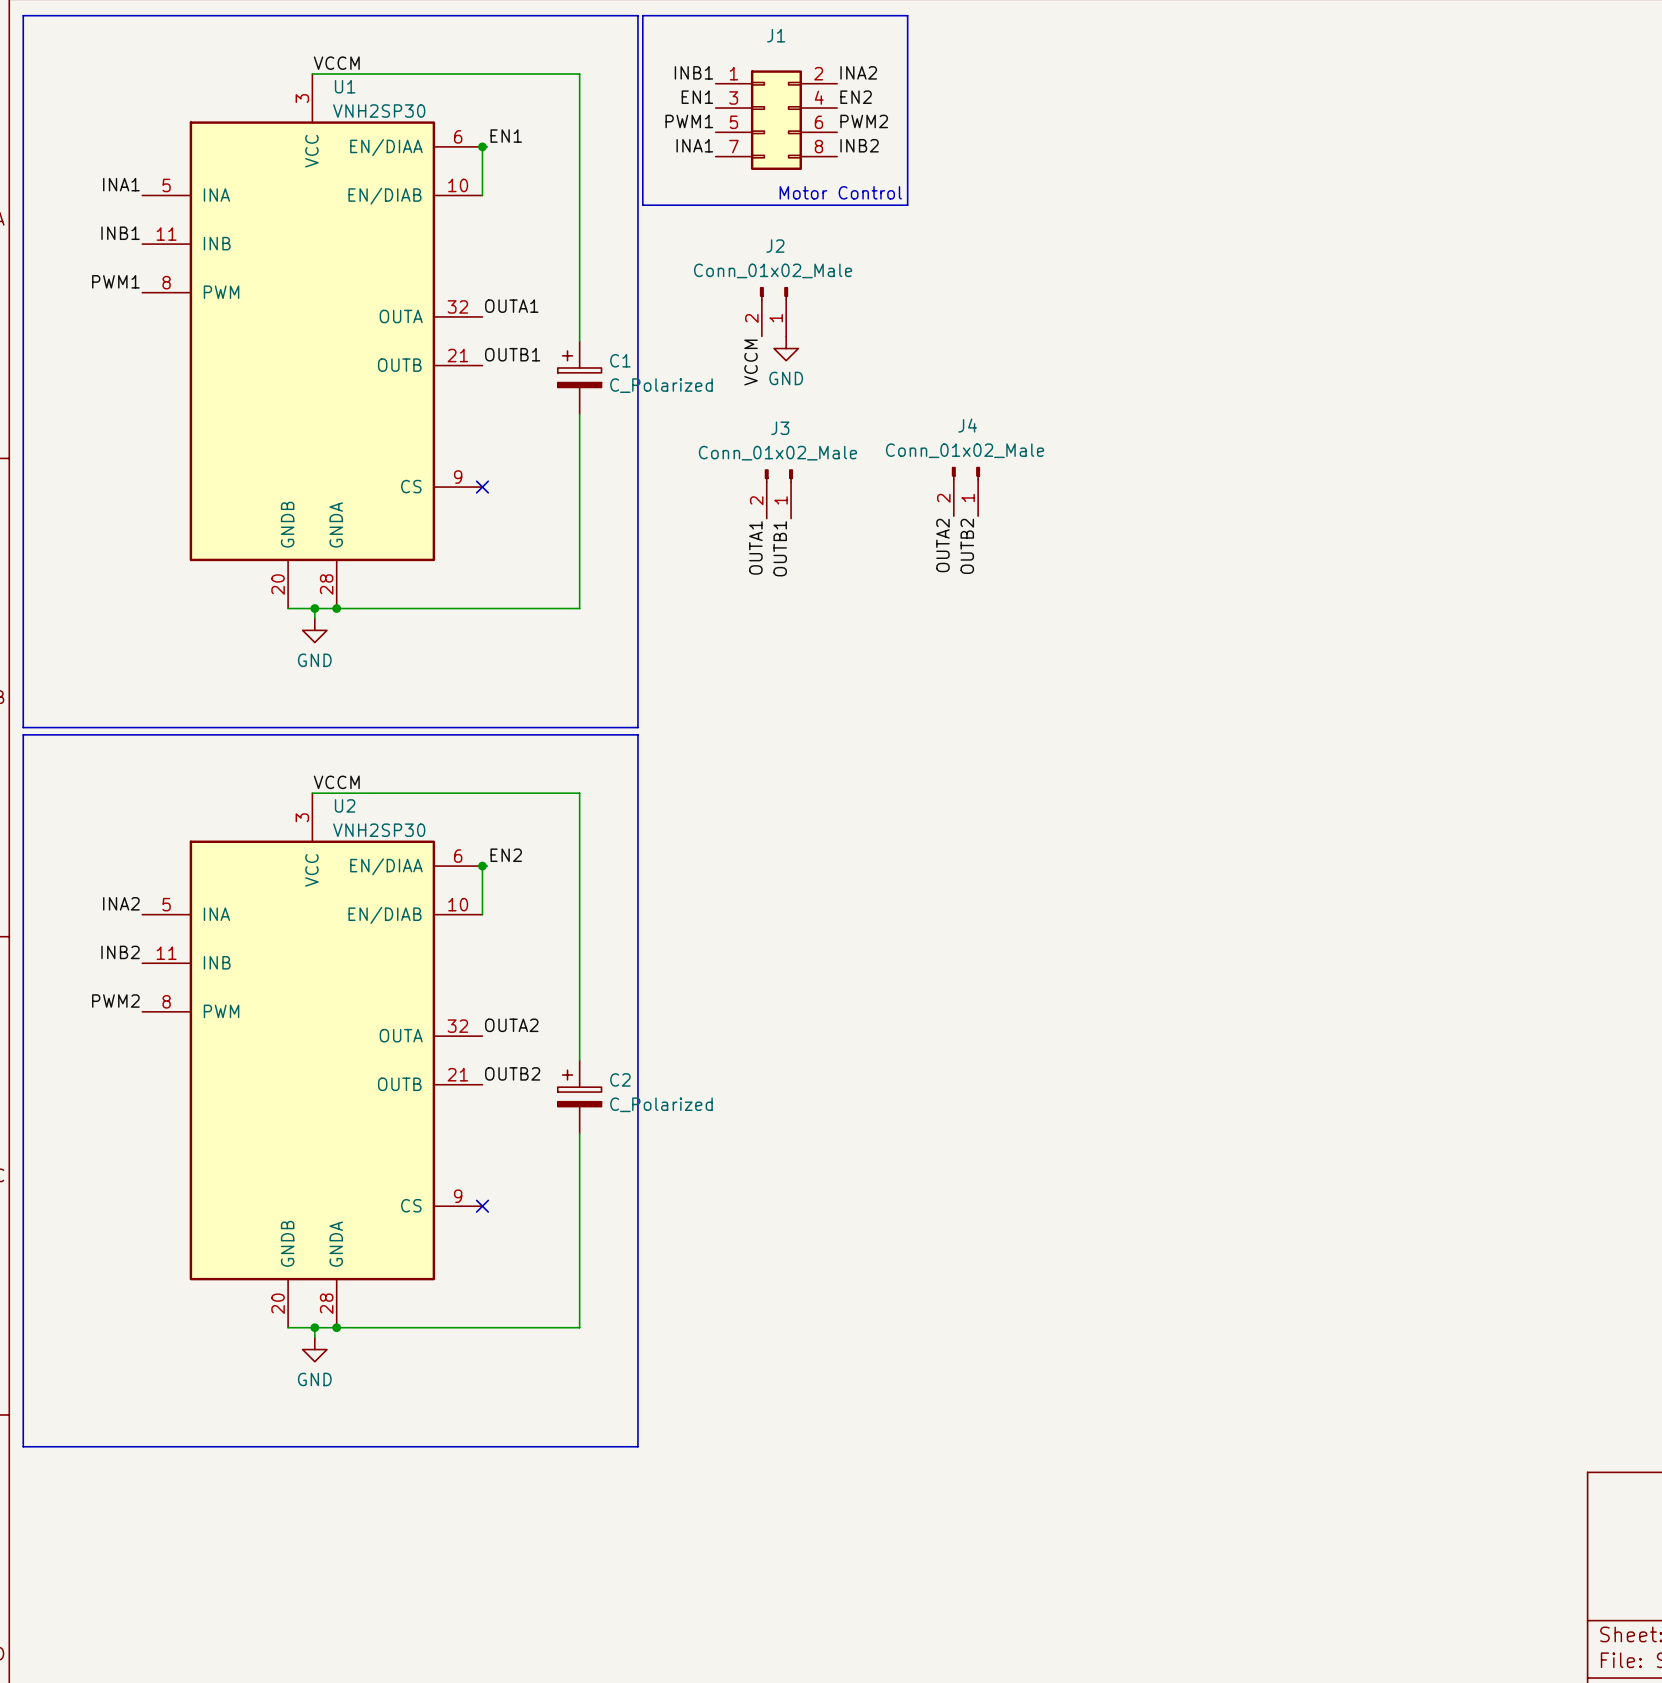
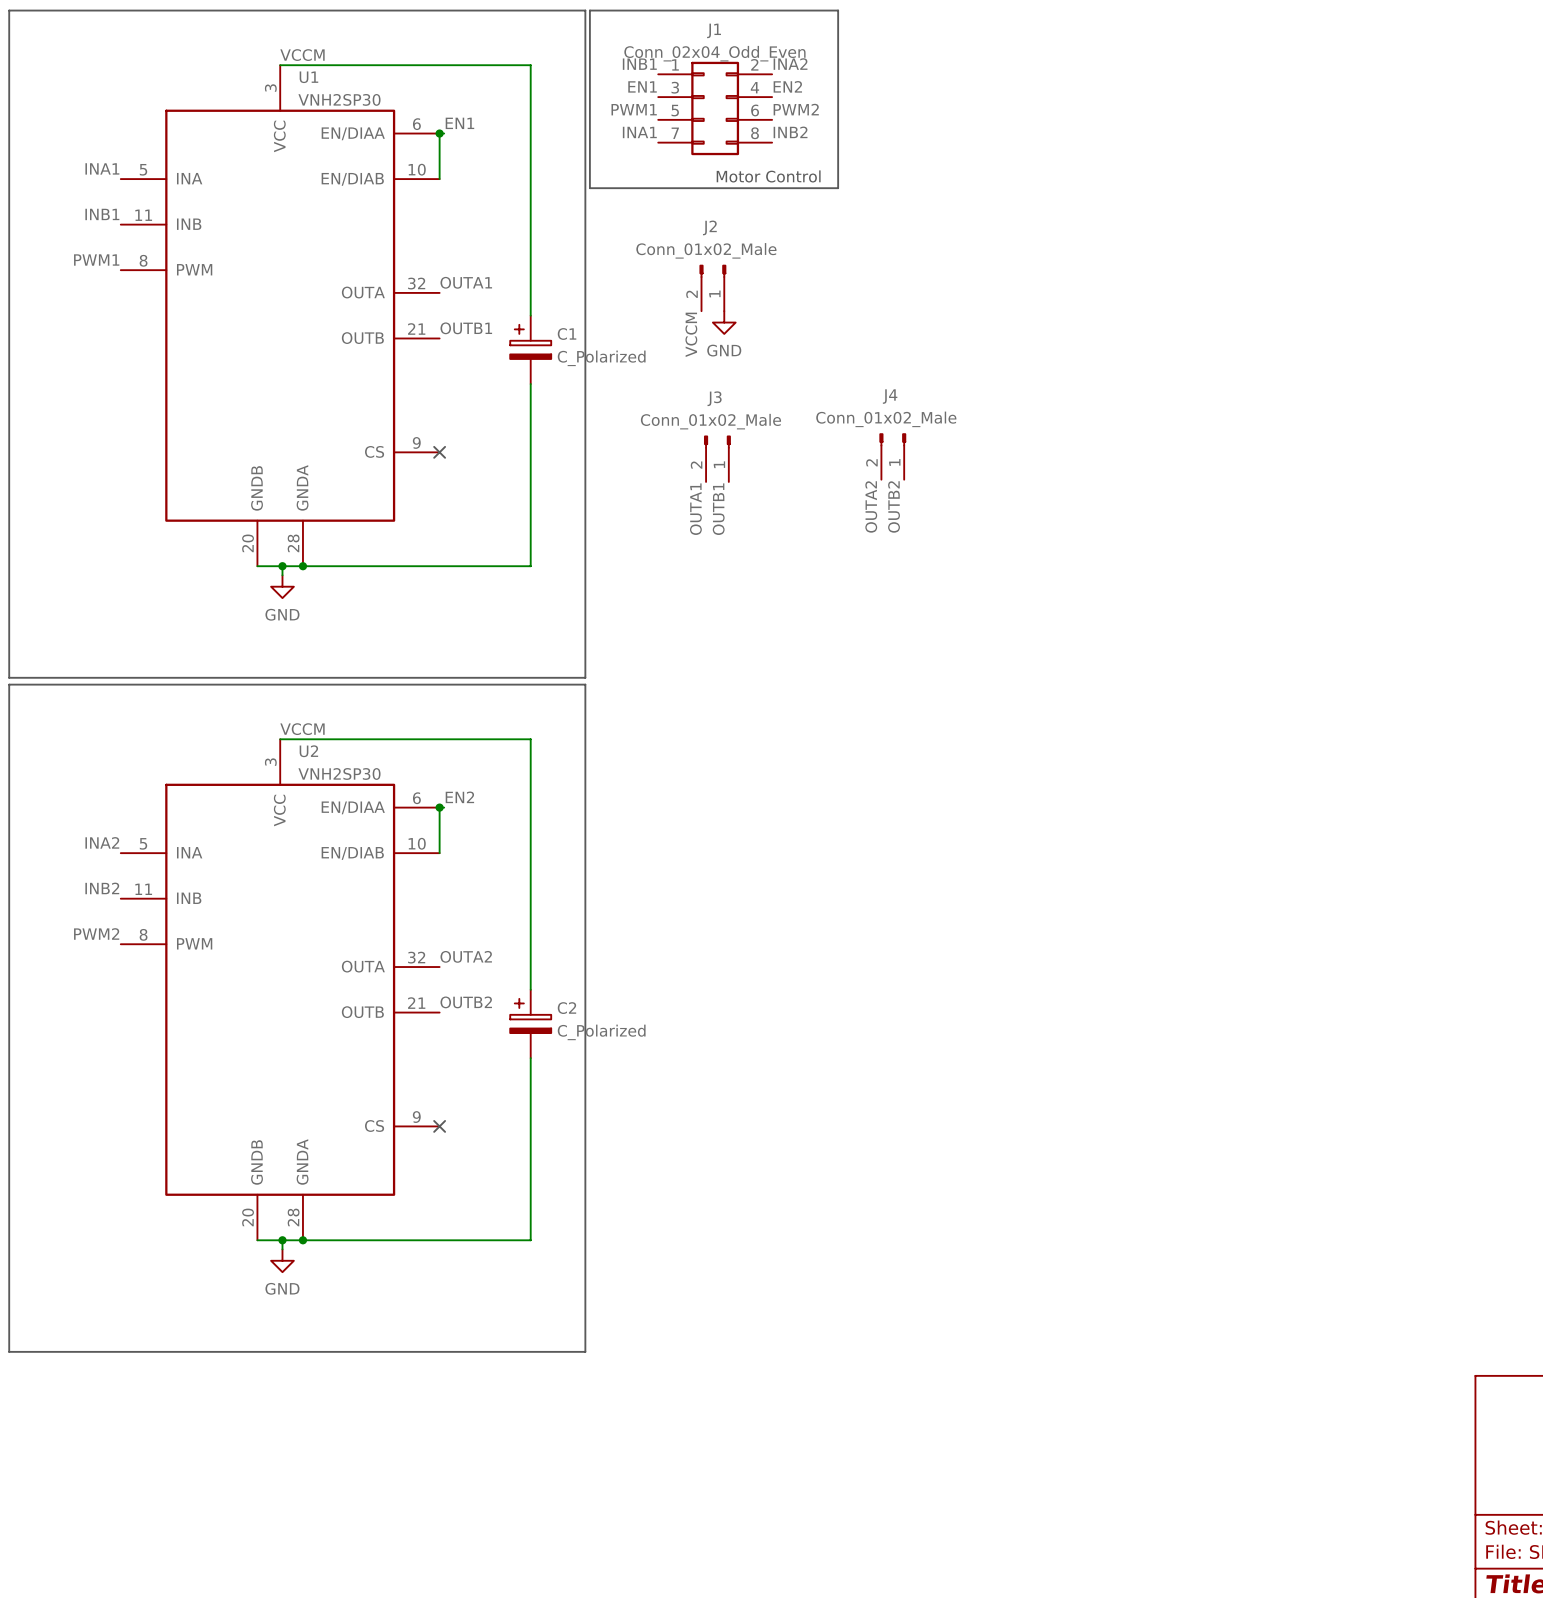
J1 value: none -> Conn_02x04_Odd_Even (714, 53)

